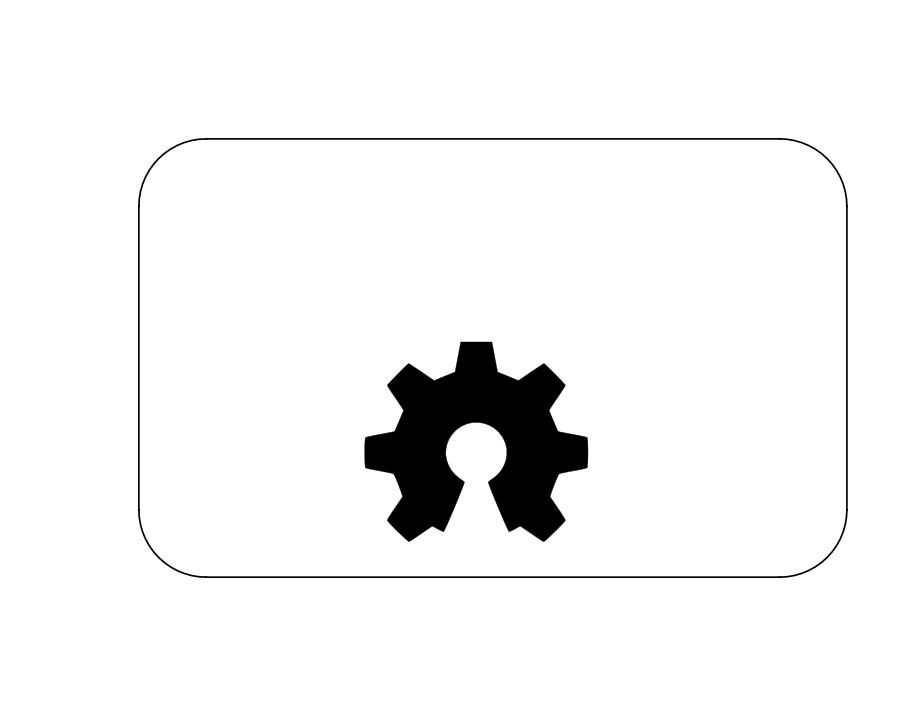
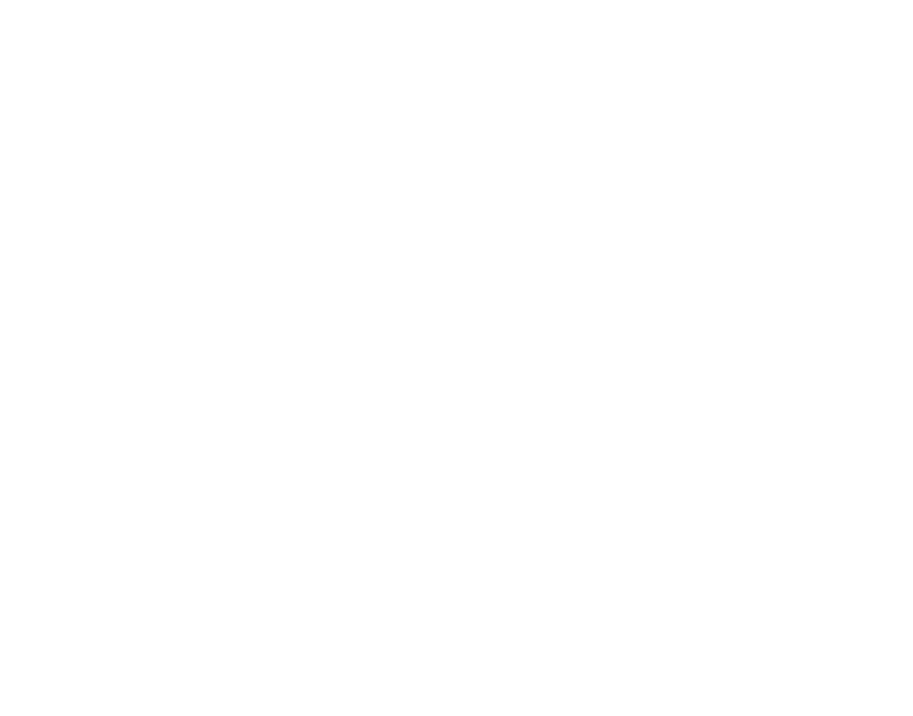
board edge: (206, 138) (779, 138) (794, 140) (815, 149) (827, 158) (836, 170) (843, 184) (846, 206) (846, 509) (843, 532) (836, 545) (827, 557) (808, 570) (794, 575) (779, 577) (206, 577) (184, 573) (170, 566) (158, 557) (149, 545) (142, 532) (139, 517) (139, 198) (145, 177) (158, 158) (177, 145) (191, 140) (206, 138) -> none
drawing: [364, 341, 589, 542] -> none

